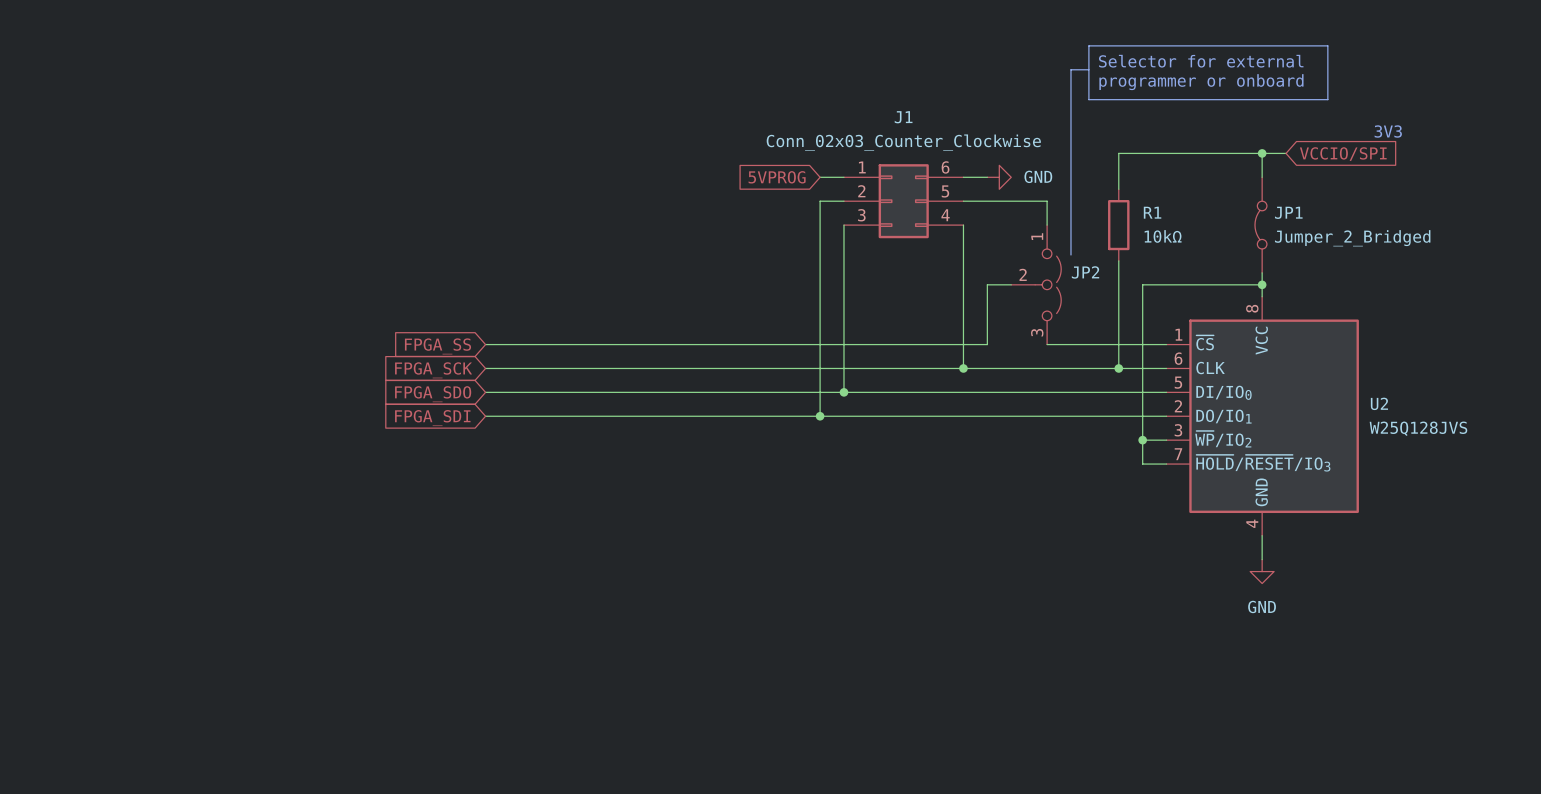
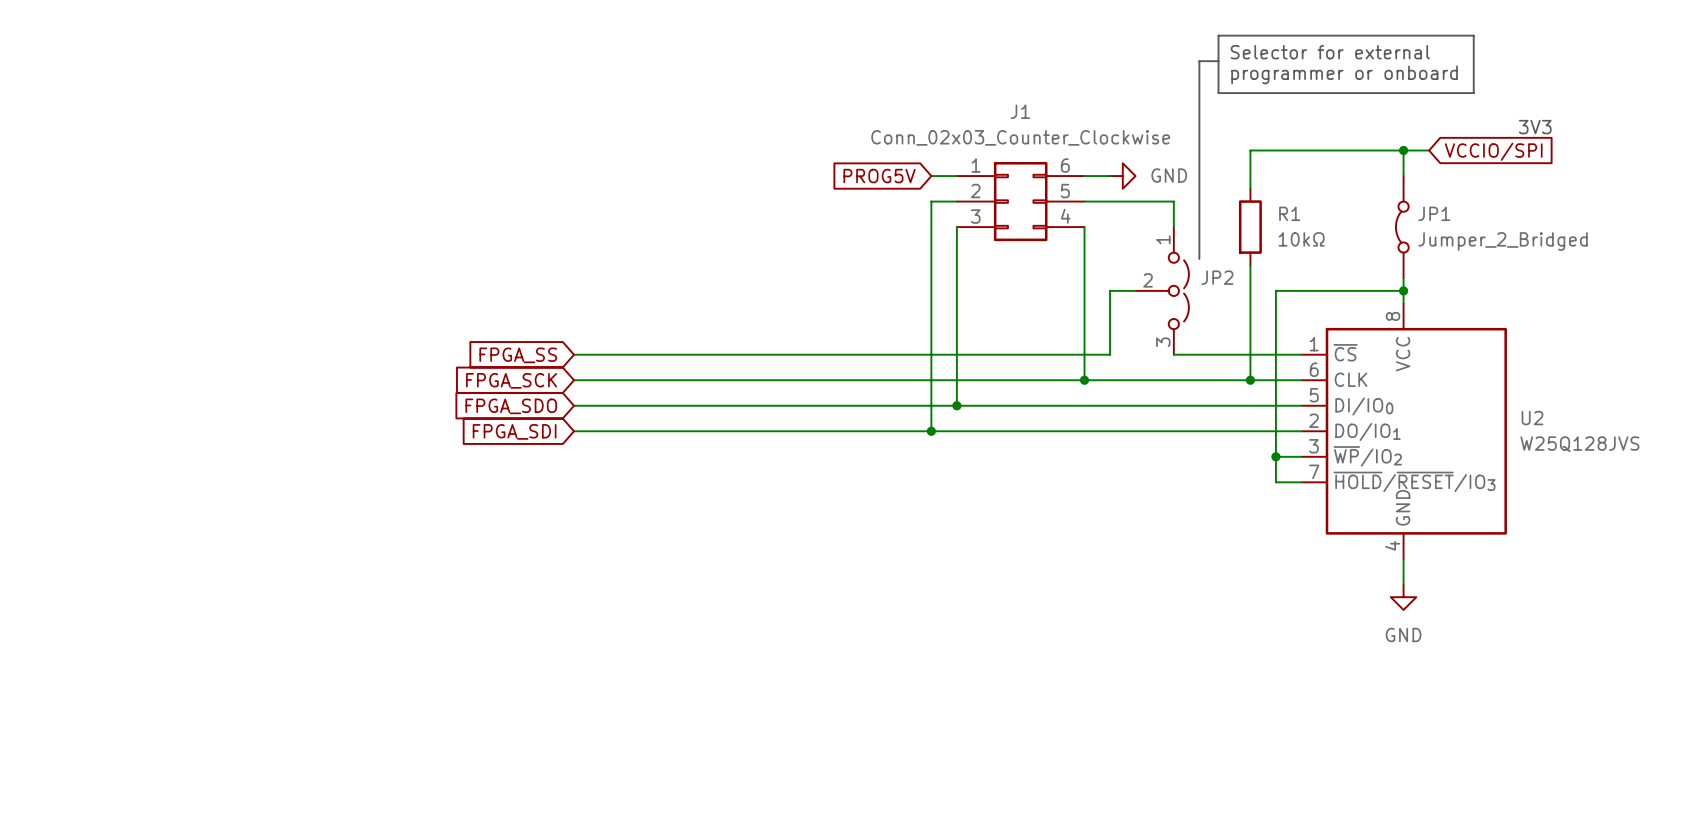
global label: 5VPROG (777, 177) -> PROG5V (879, 176)

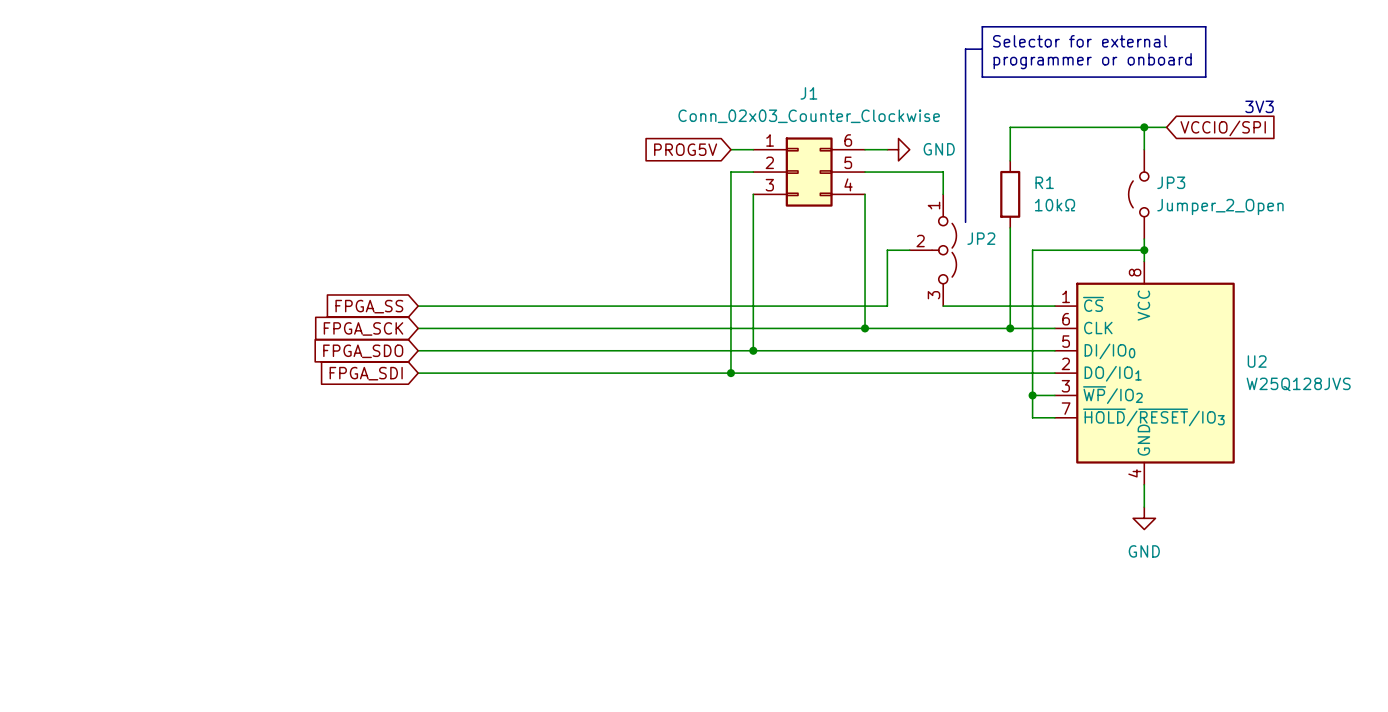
JP3: none -> Jumper_2_Open (1138, 194)
JP1: Jumper_2_Bridged (1402, 227) -> none

